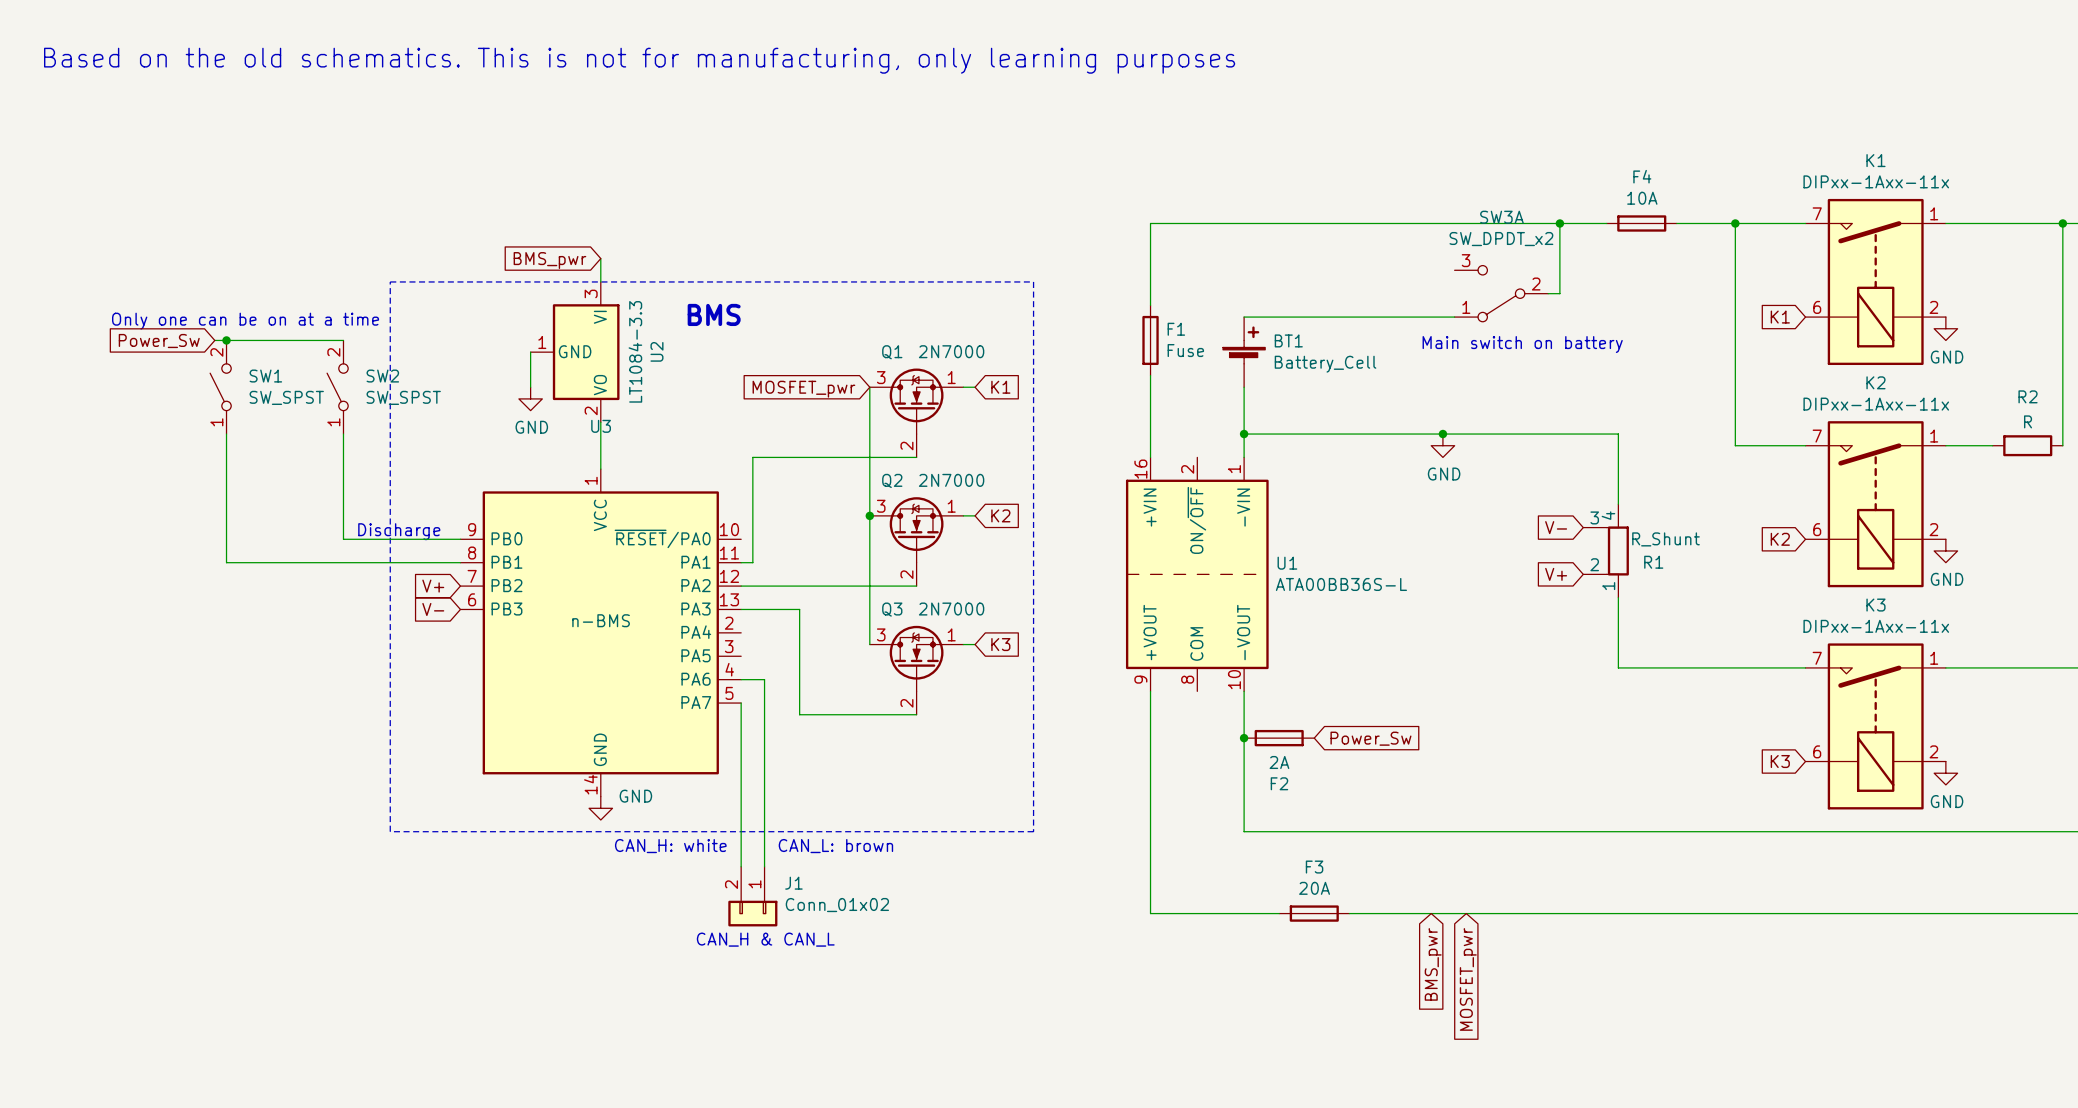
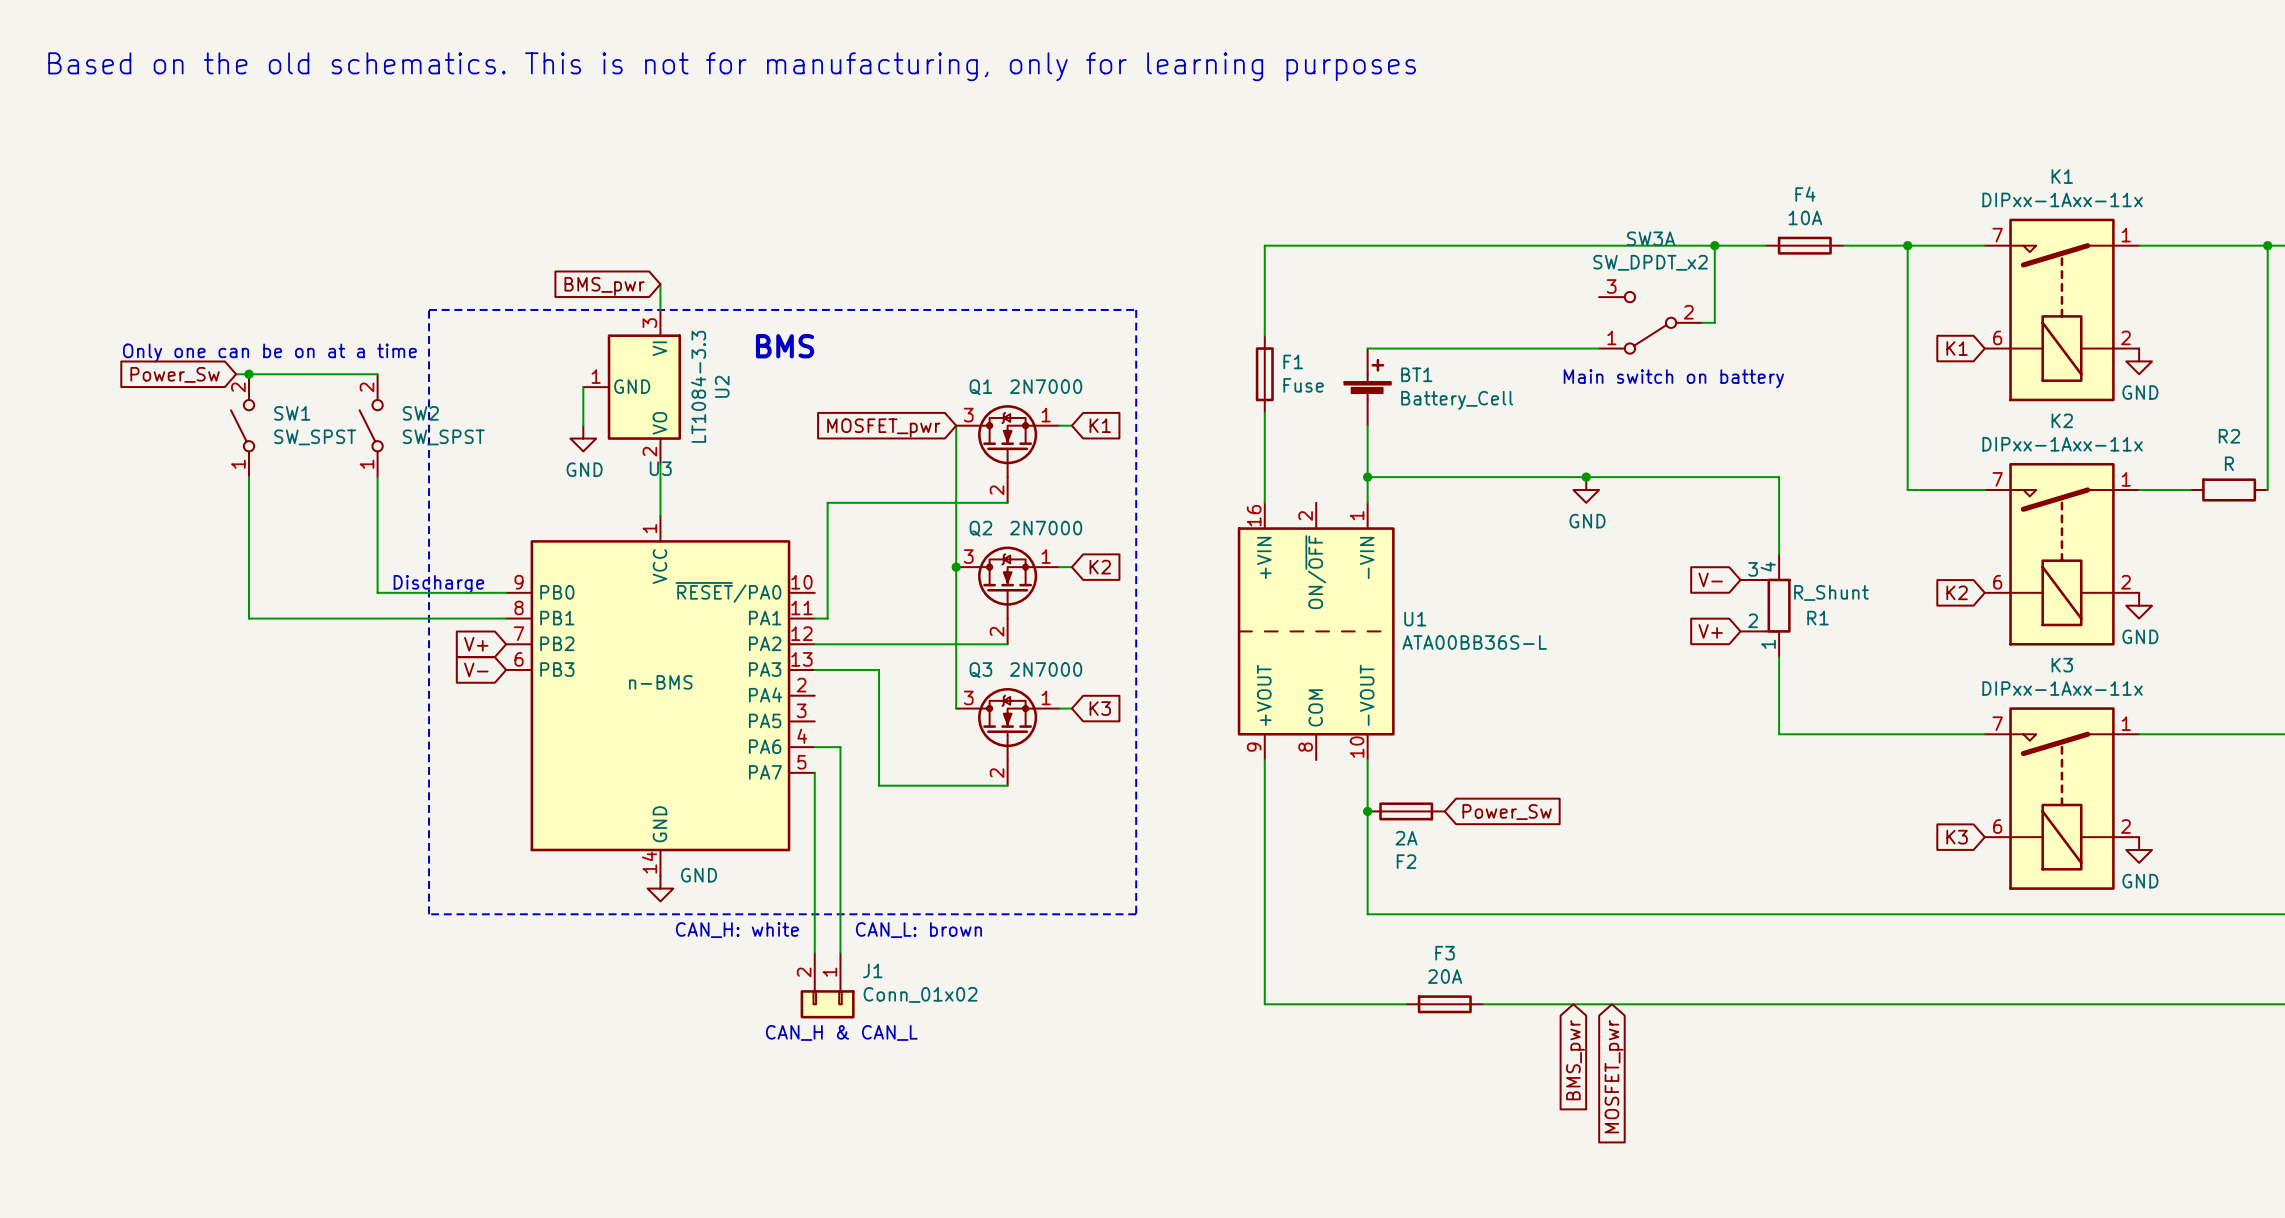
text: Based on the old schematics. This is not for manufacturing, only learning purposes (639, 60) -> Based on the old schematics. This is not for manufacturing, only for learning purposes (732, 66)

